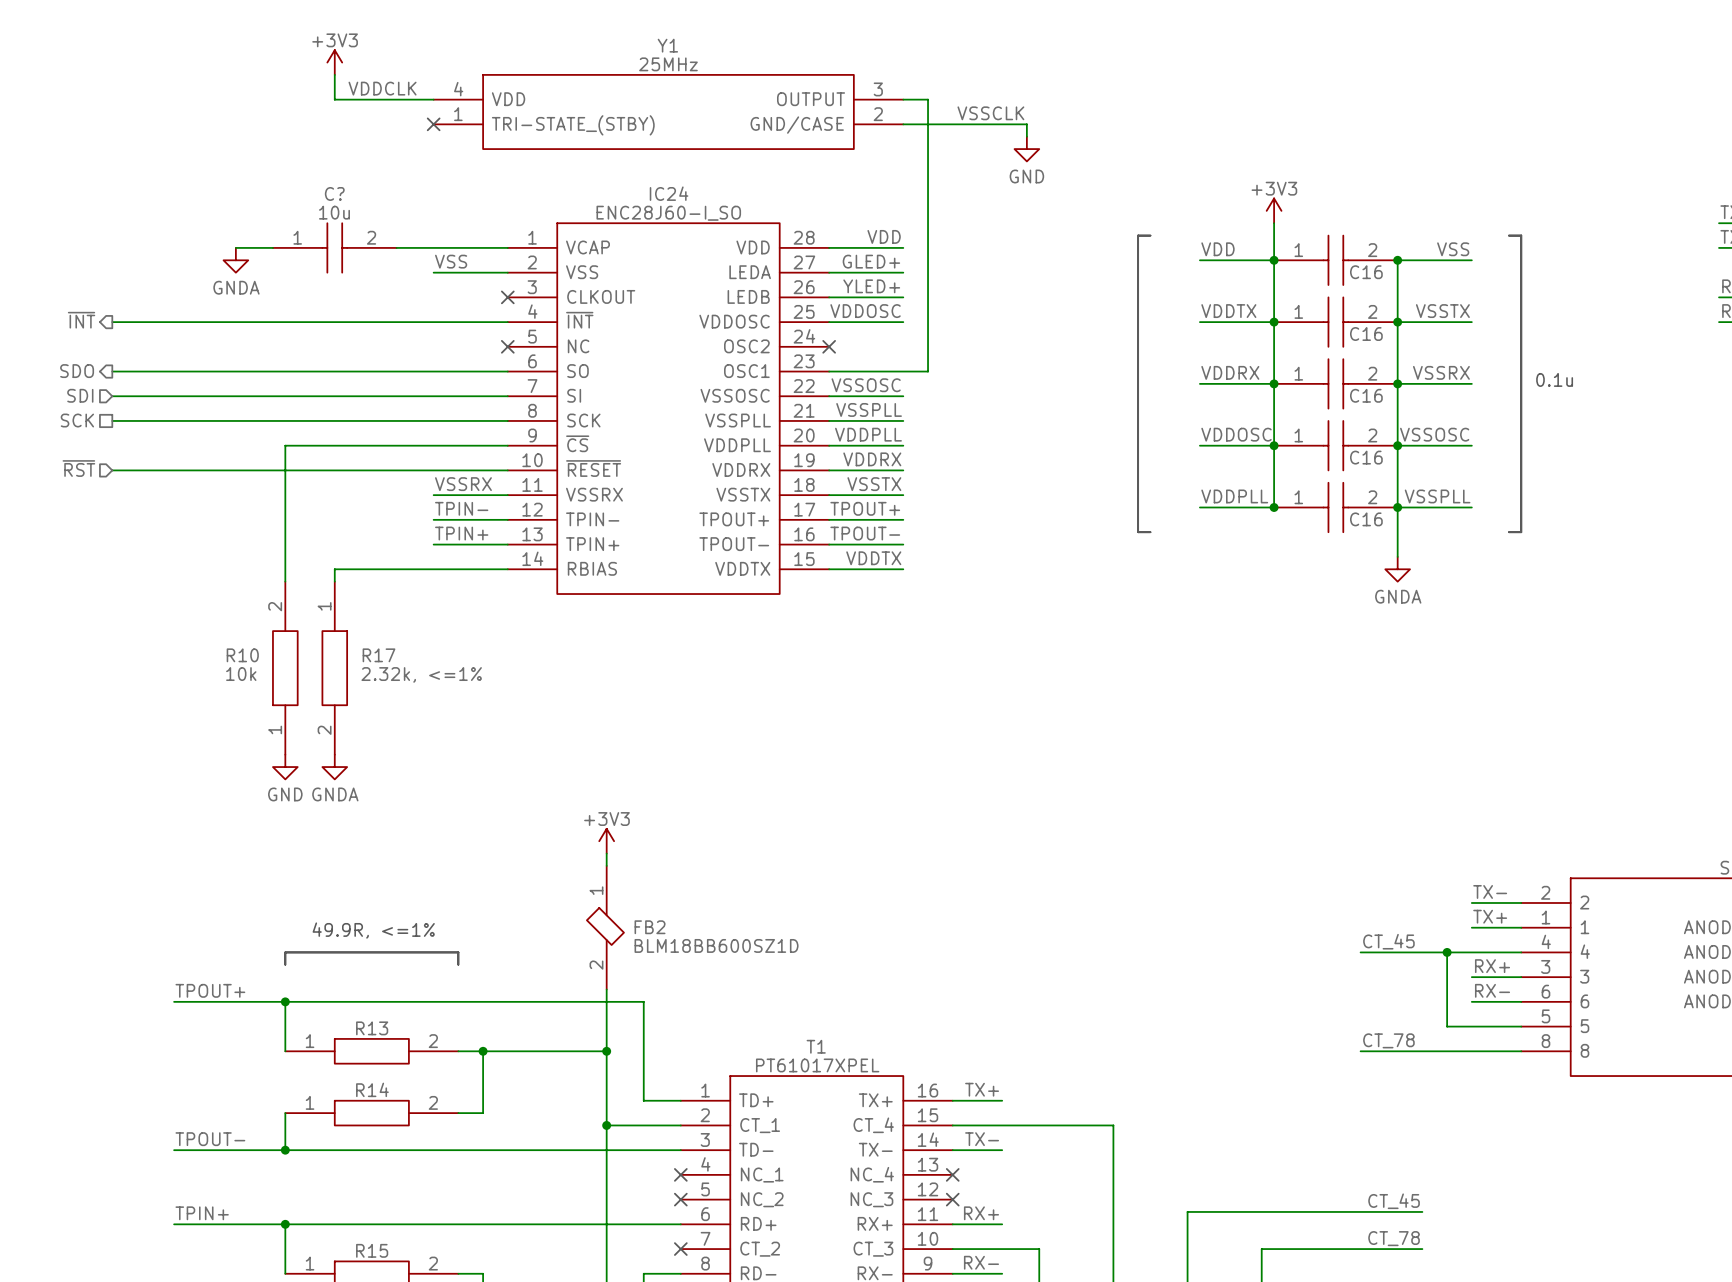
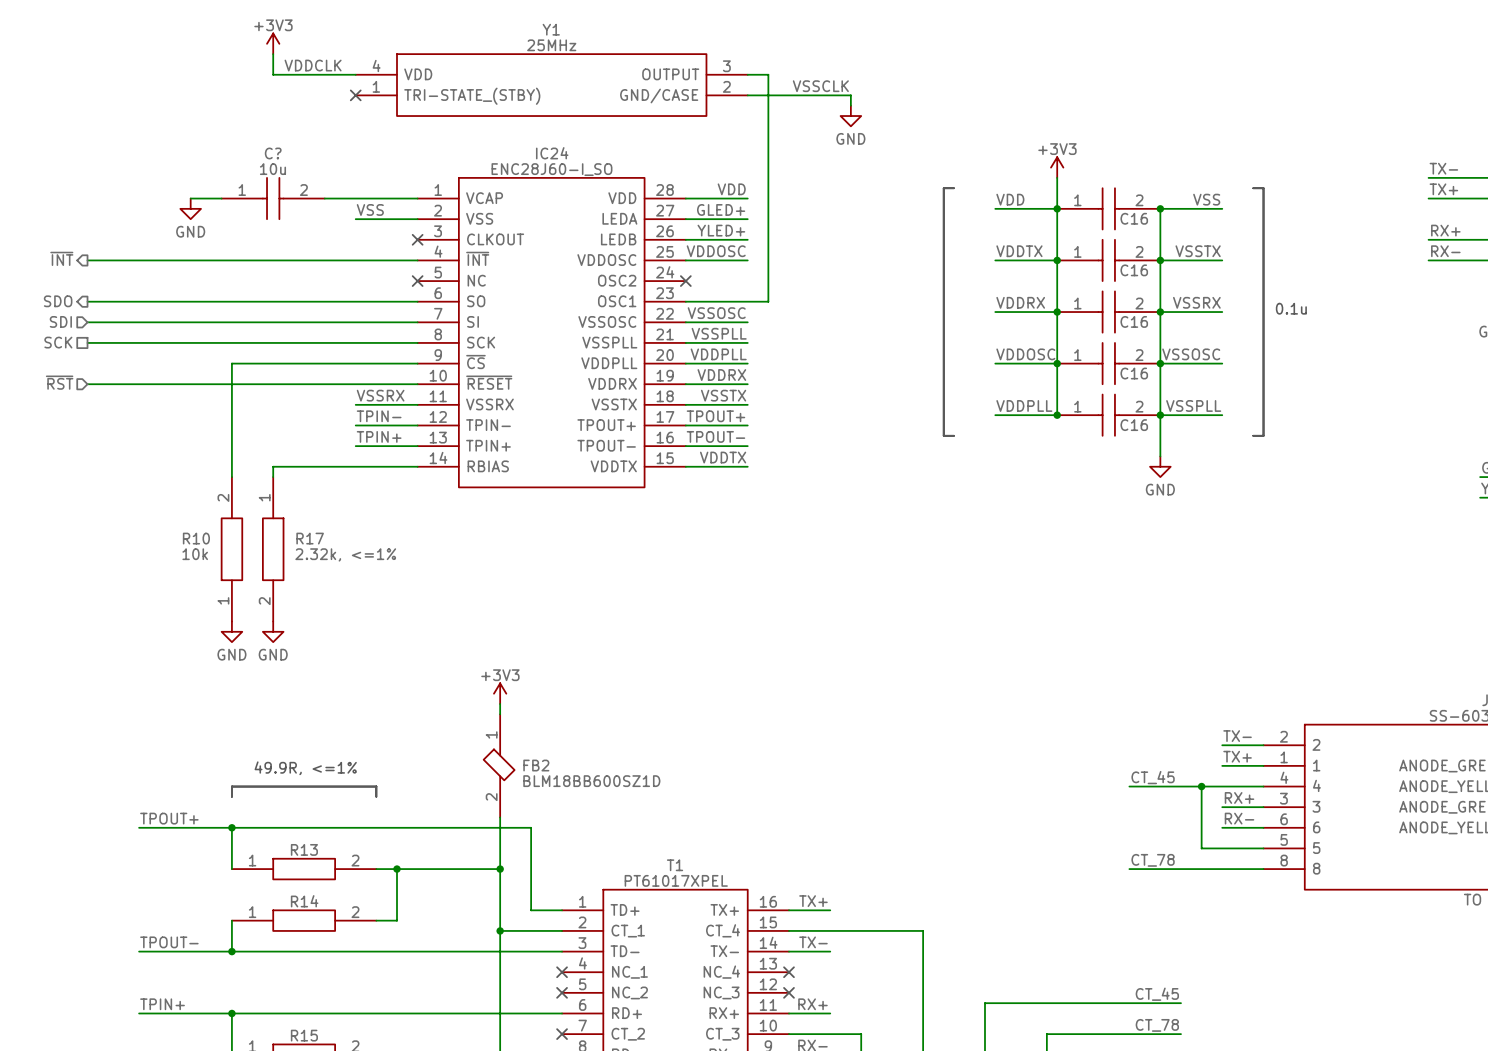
power symbol: GNDA (235, 260) -> GND (190, 208)
power symbol: GNDA (1397, 569) -> GND (1160, 466)
power symbol: GNDA (334, 767) -> GND (273, 631)

